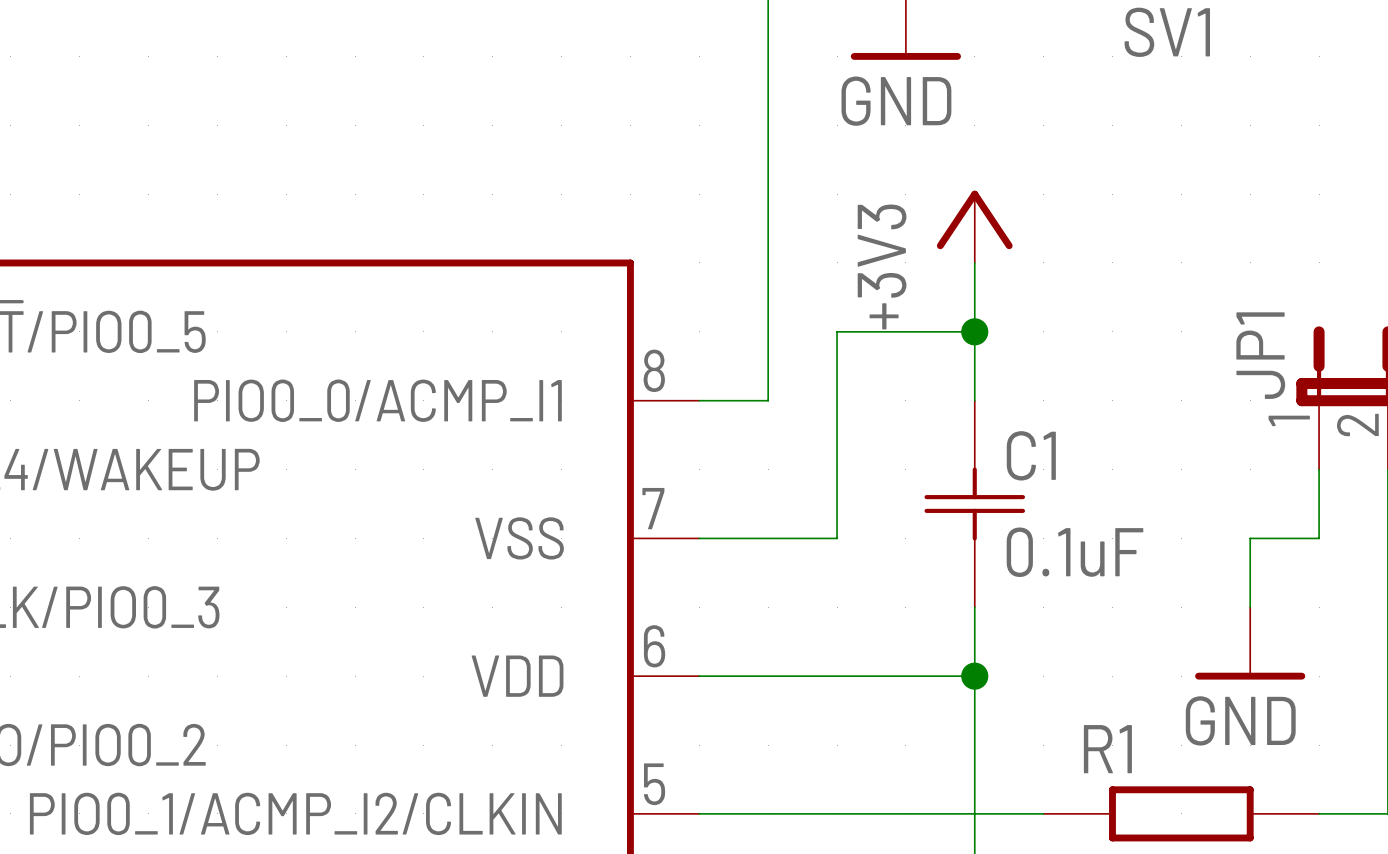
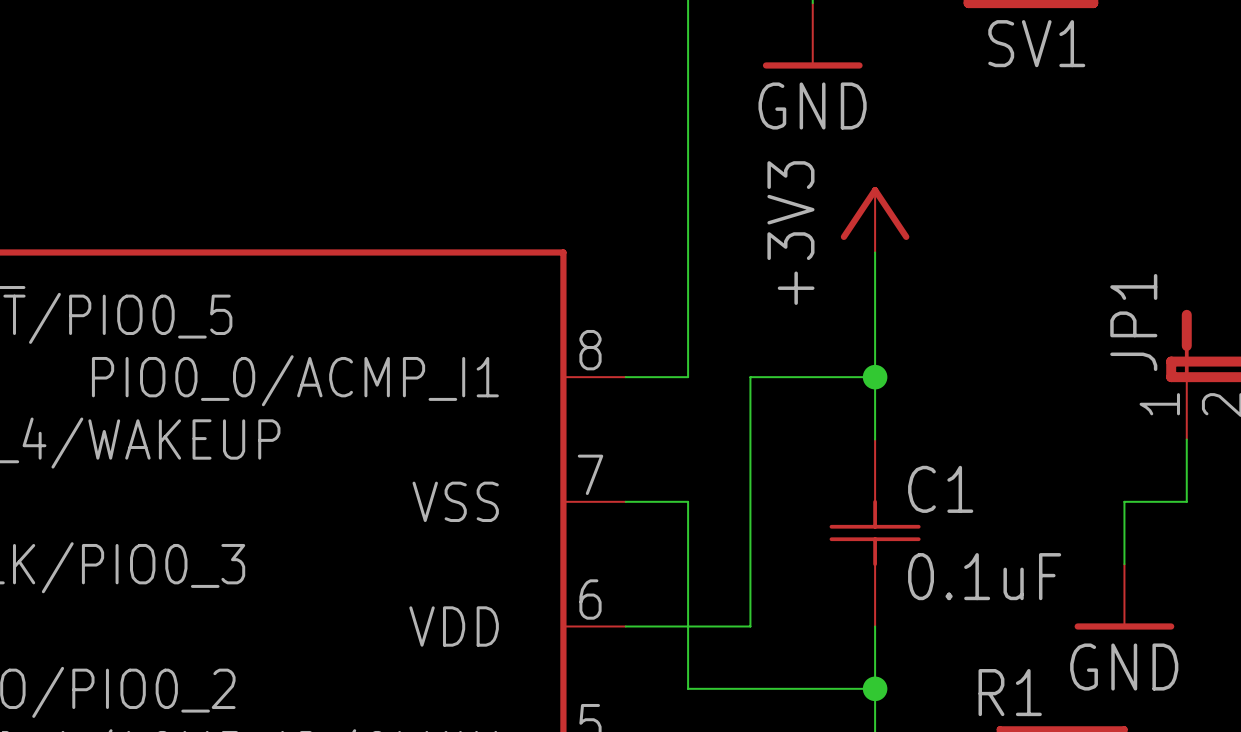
wire: (974, 331) (837, 331) (837, 400) -> (875, 439) (875, 377) (750, 377)
junction position: (974, 331) -> (875, 377)
C1 position: (974, 504) -> (875, 532)
wire: (768, 538) (837, 538) -> (688, 501) (688, 688) (875, 688)
wire: (974, 607) (974, 676) (837, 676) -> (750, 501) (750, 626)
junction position: (974, 676) -> (875, 688)

